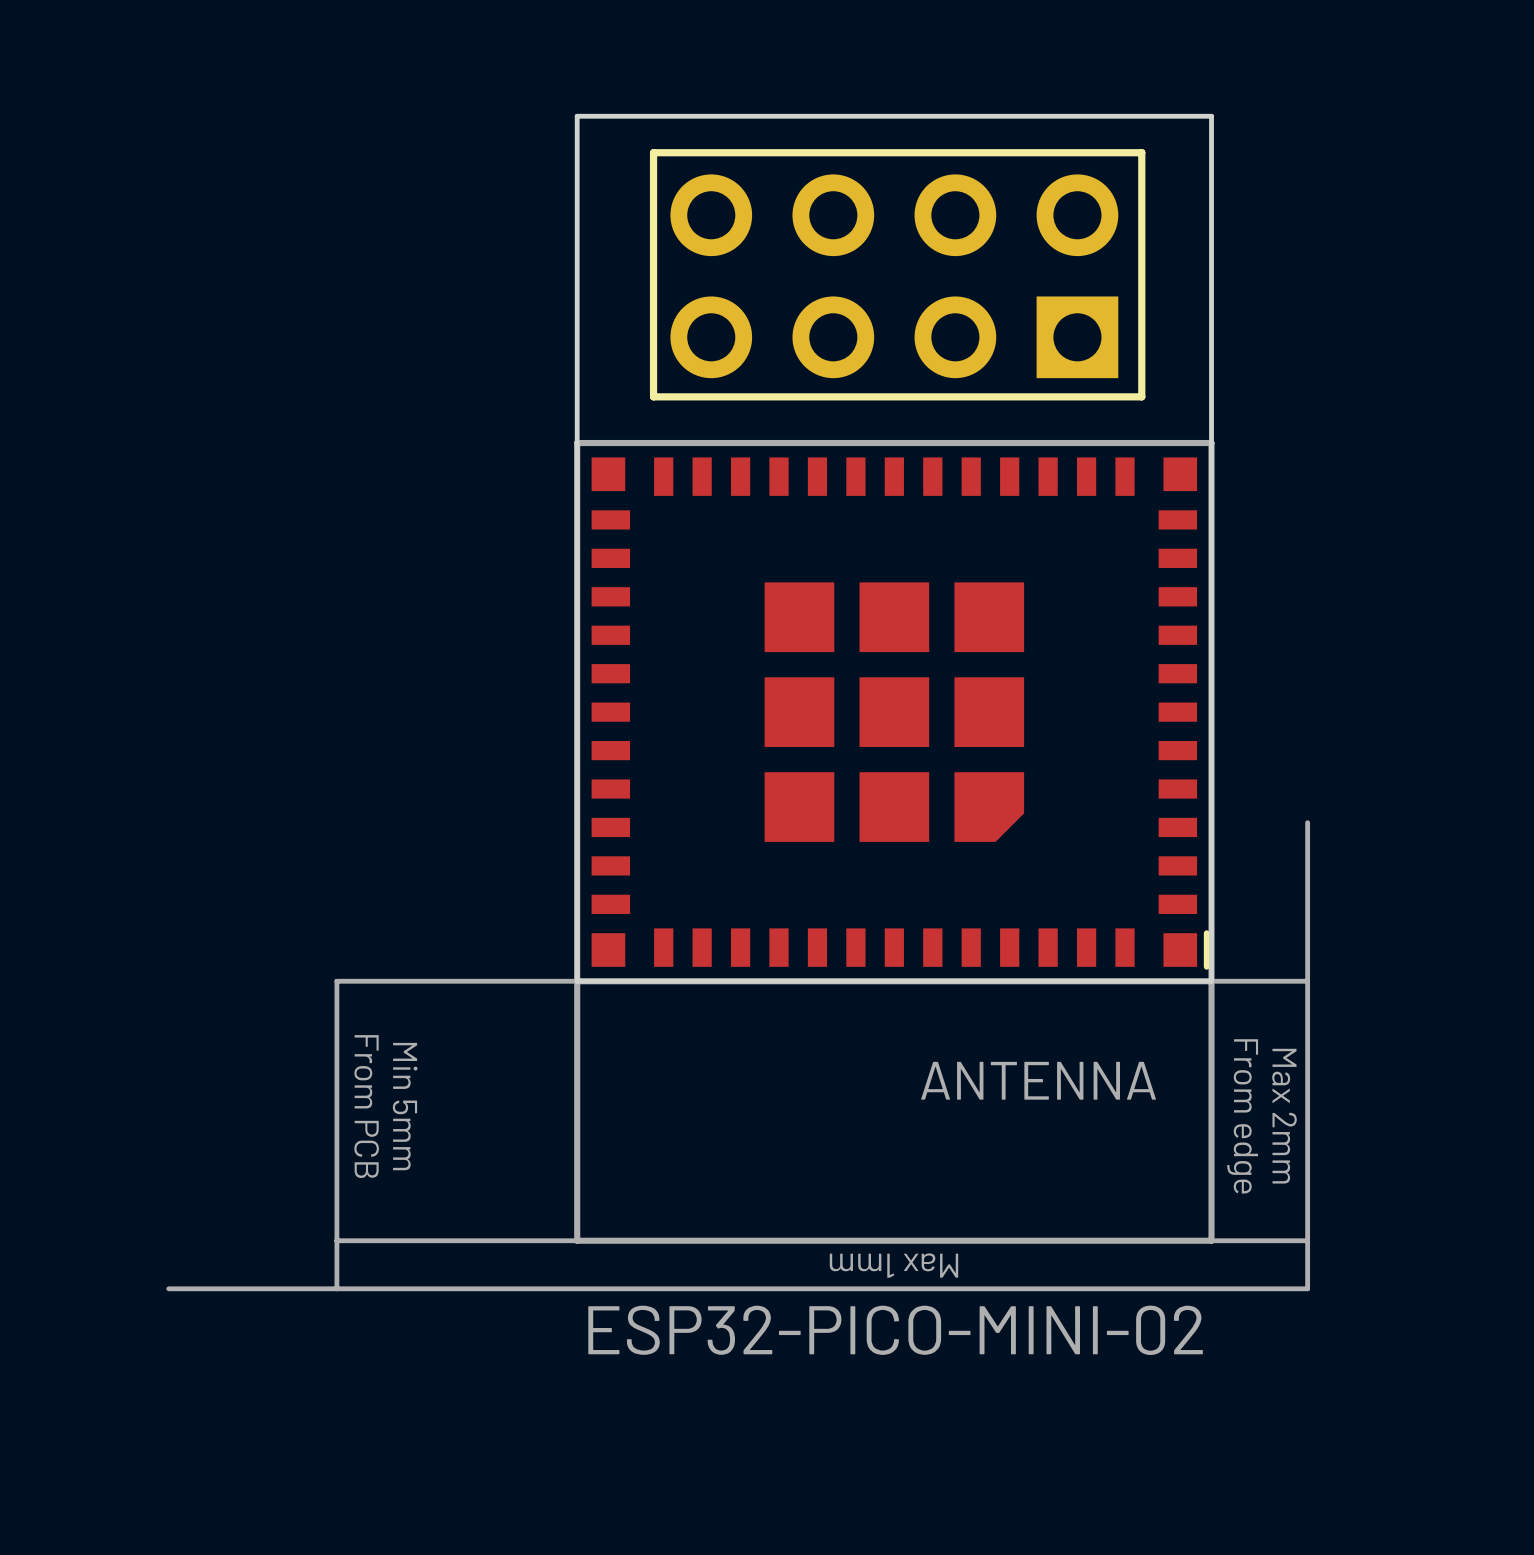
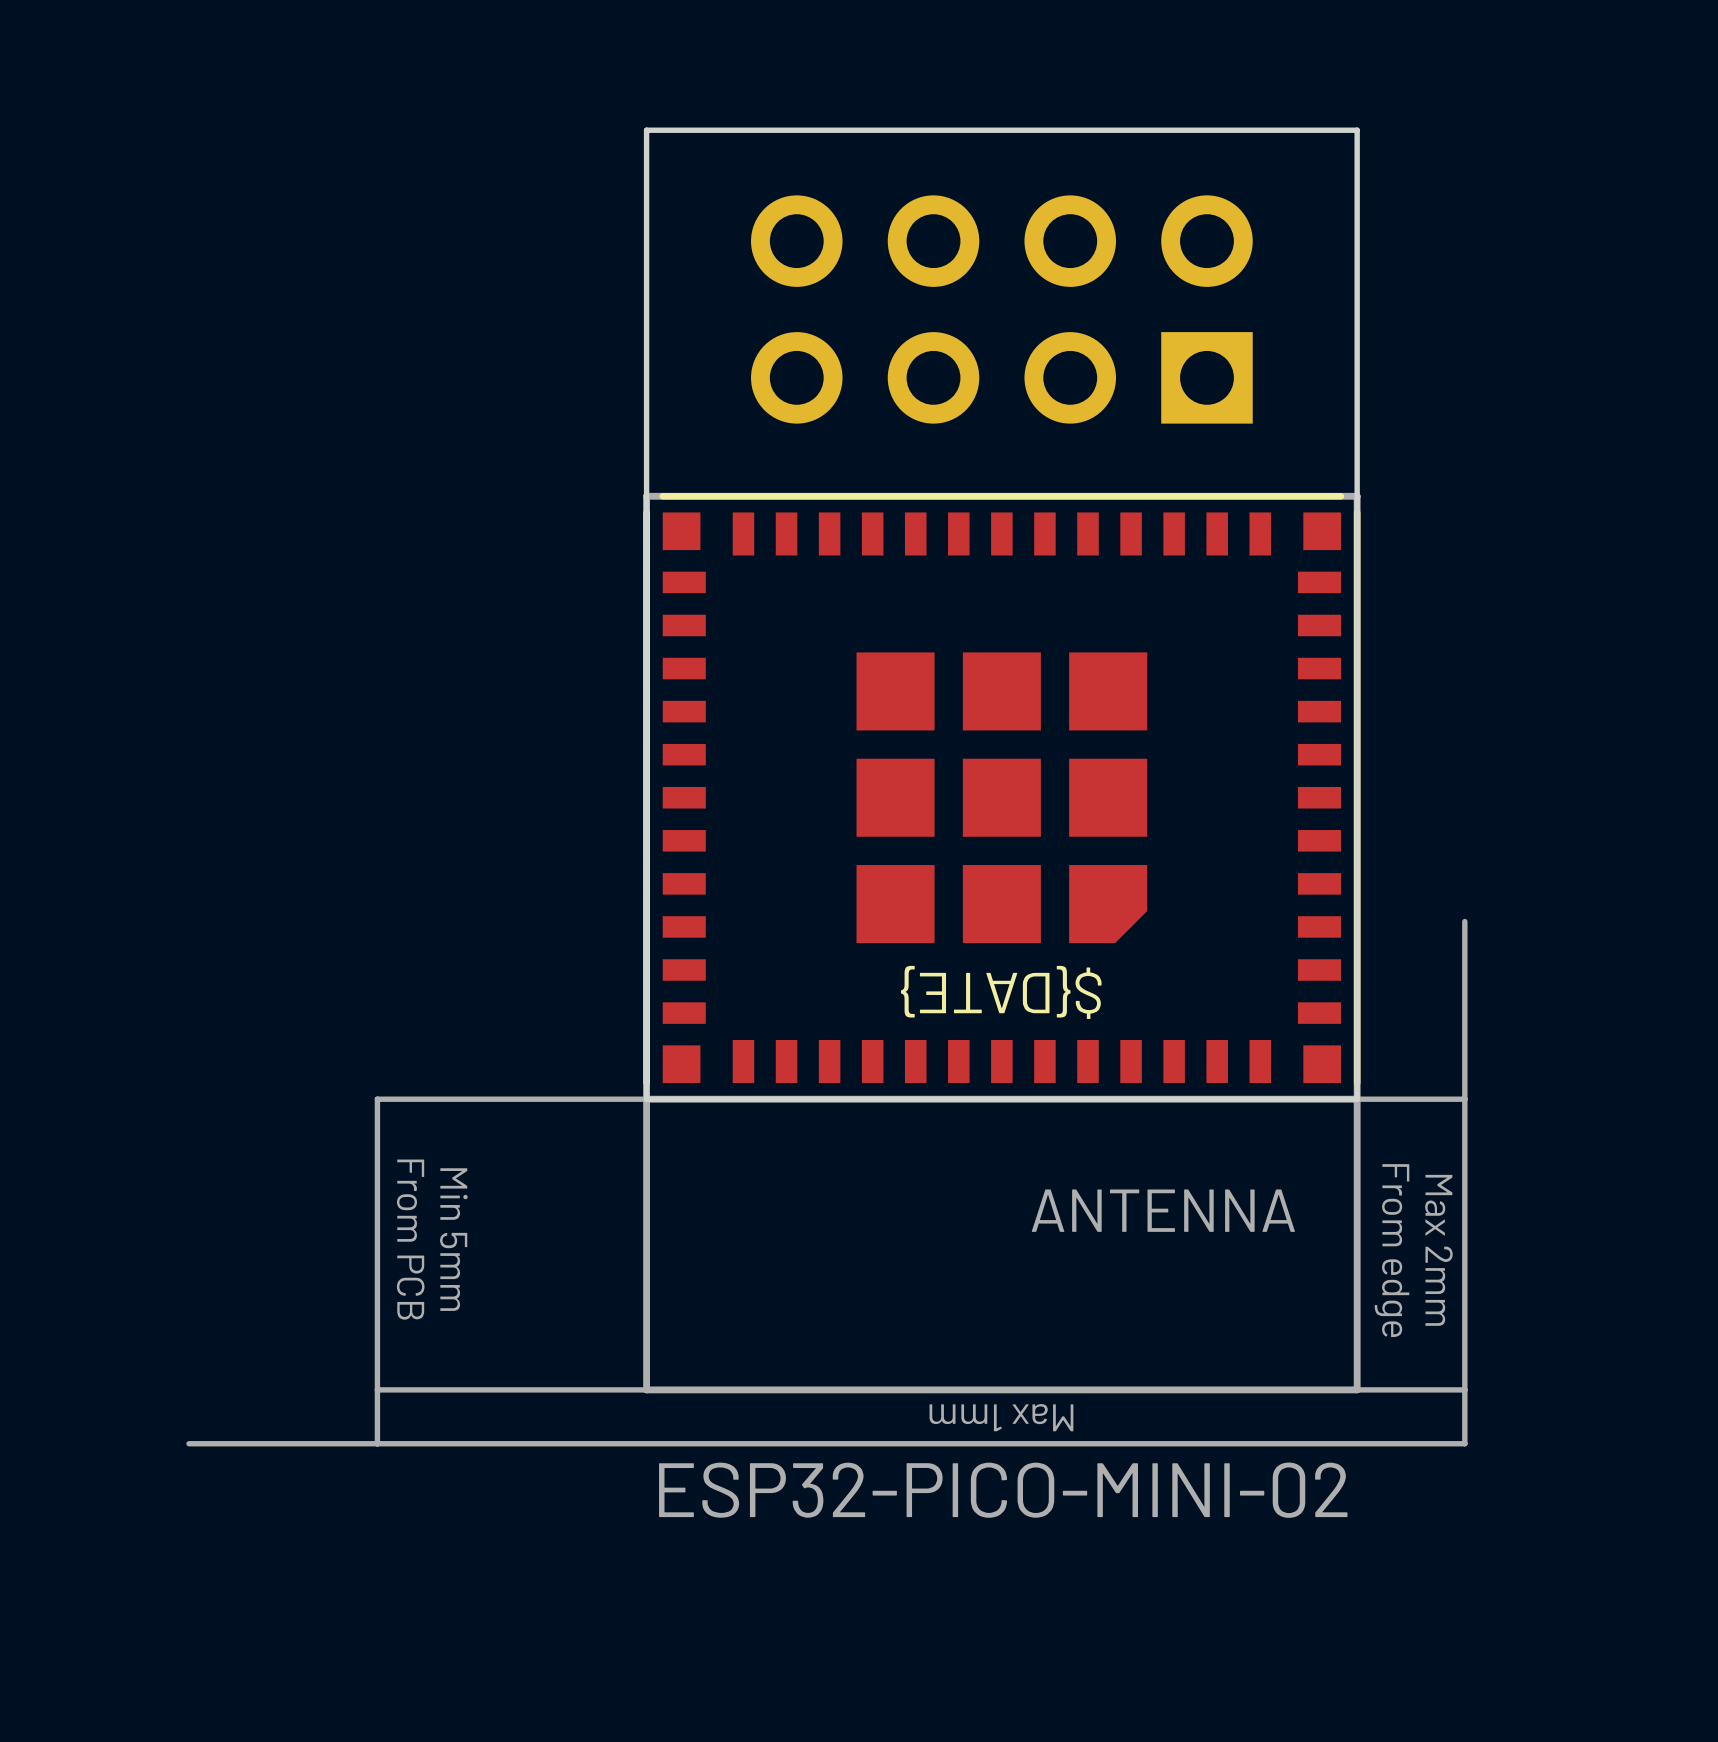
line: (653, 152) (1141, 152) (1141, 396) (653, 396) (653, 152) -> none
part footprint: [166, 439, 1311, 1292] -> [186, 492, 1468, 1447]

